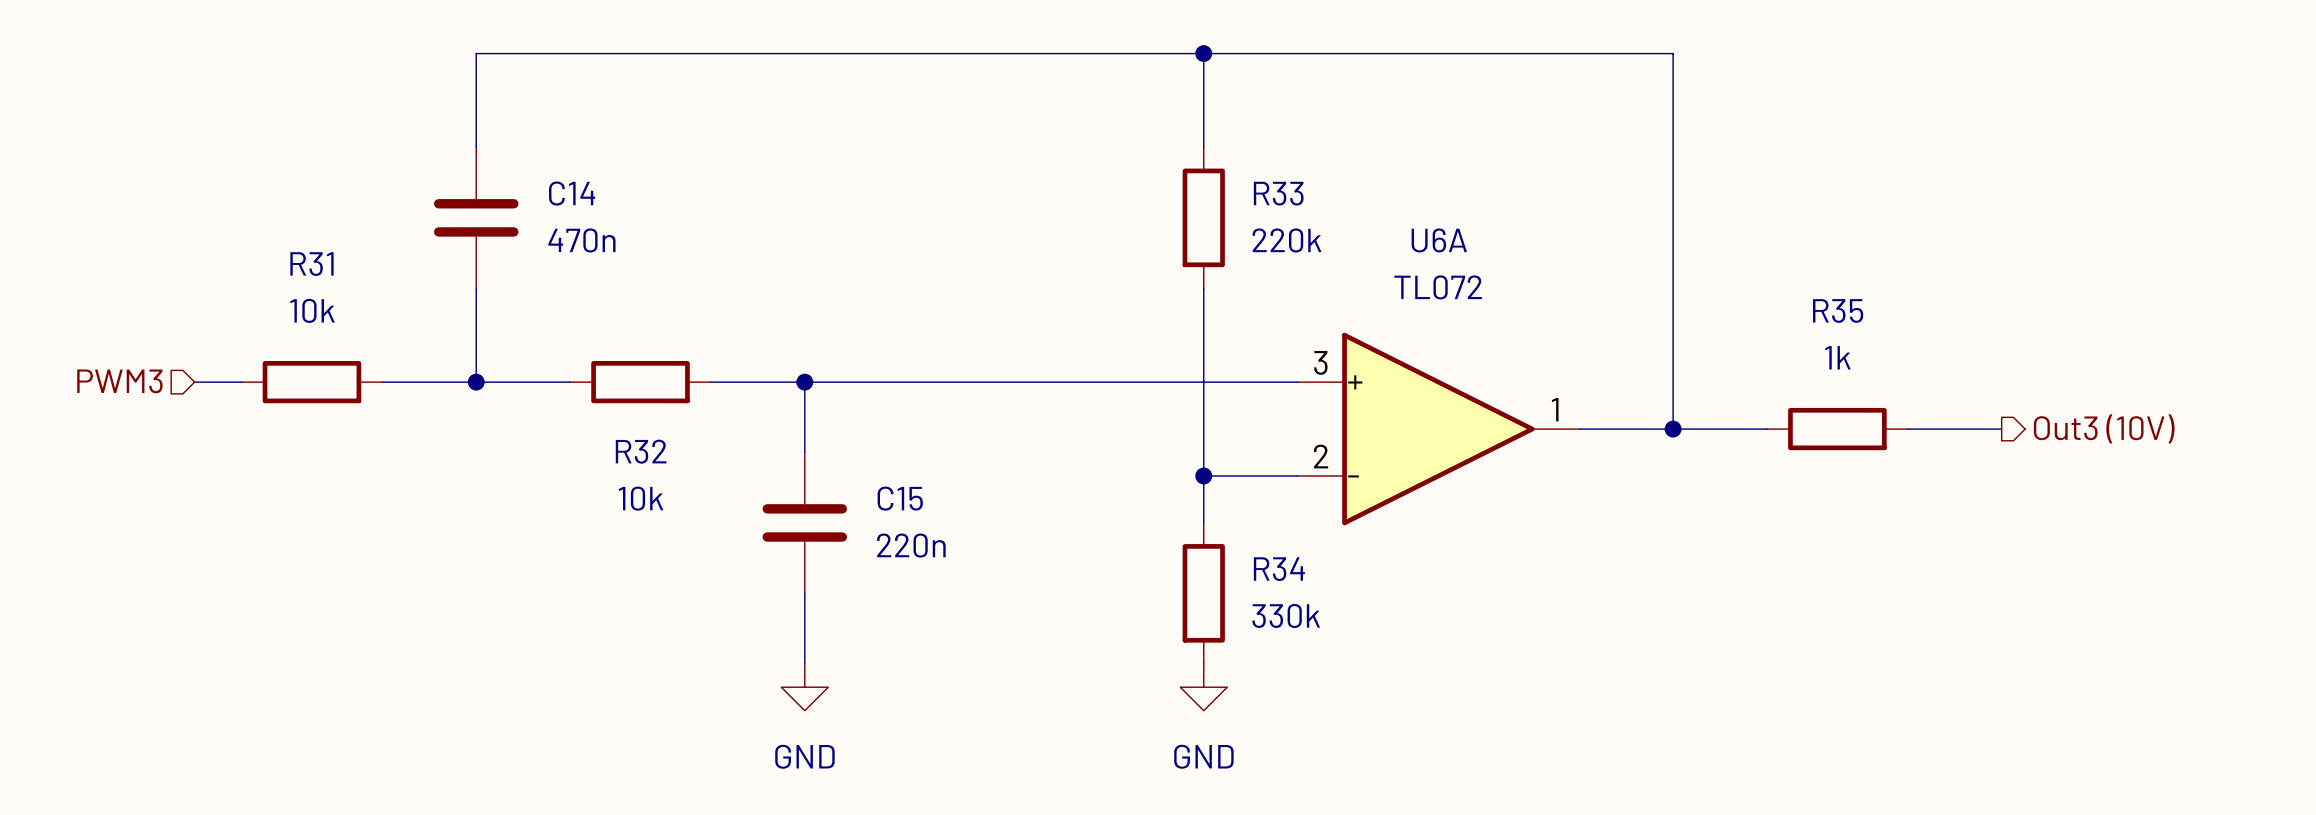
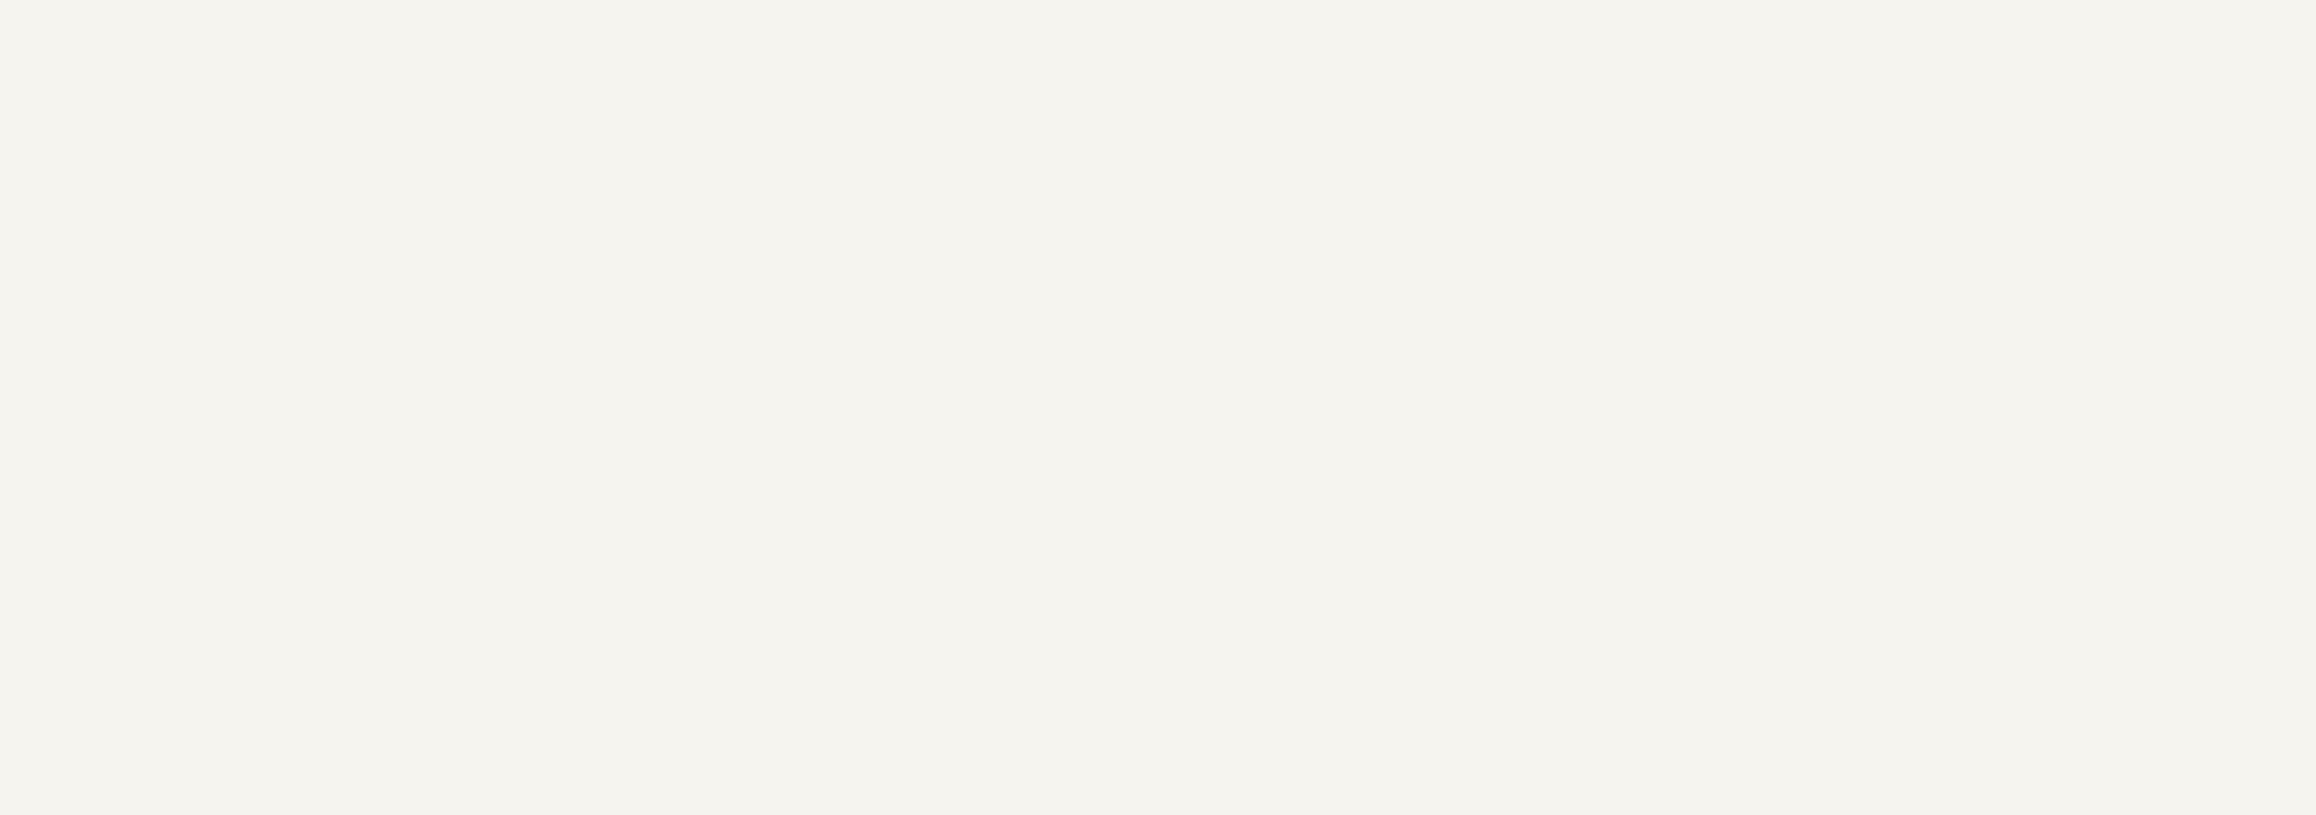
wire: (1203, 53) (1203, 147) -> none
junction: (1203, 53) -> none
wire: (476, 147) (476, 53) (1673, 53) (1673, 429) -> none
C14: 470n (476, 217) -> none
R33: 220k (1203, 217) -> none
wire: (476, 288) (476, 382) -> none
wire: (1203, 288) (1203, 522) -> none
hierarchical label: PWM3 (119, 381) -> none
wire: (194, 382) (241, 382) -> none
R31: 10k (311, 382) -> none
wire: (382, 382) (570, 382) -> none
junction: (476, 382) -> none
R32: 10k (640, 382) -> none
wire: (710, 382) (1297, 382) -> none
wire: (804, 382) (804, 452) -> none
junction: (804, 382) -> none
hierarchical label: Out3 (10V) (2104, 428) -> none
U6A: TL072 (1438, 429) -> none
wire: (1579, 429) (1766, 429) -> none
junction: (1673, 429) -> none
R35: 1k (1837, 429) -> none
wire: (1907, 429) (2001, 429) -> none
wire: (1203, 476) (1297, 476) -> none
junction: (1203, 476) -> none
C15: 220n (804, 522) -> none
wire: (804, 593) (804, 663) -> none
R34: 330k (1203, 593) -> none
power symbol: GND (804, 687) -> none
power symbol: GND (1203, 687) -> none

